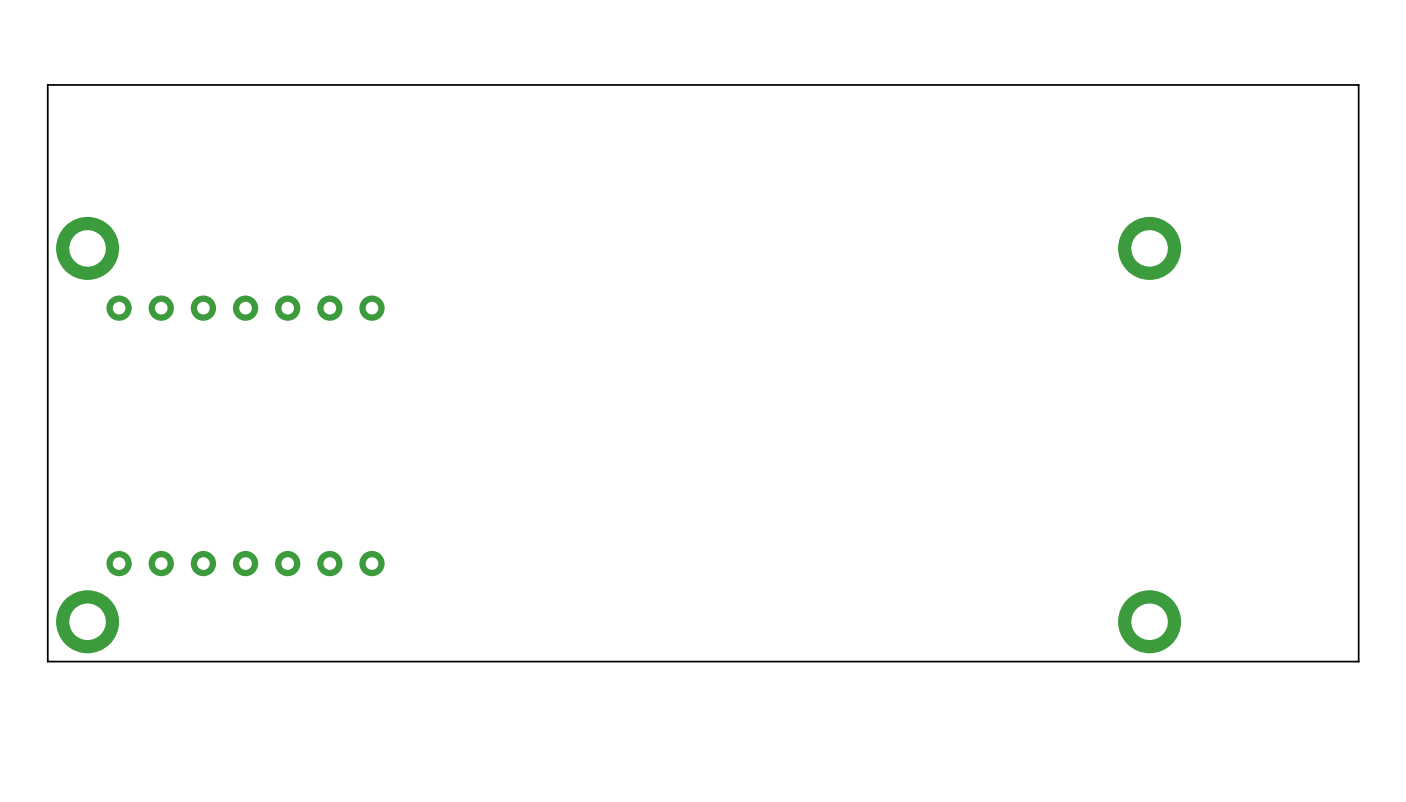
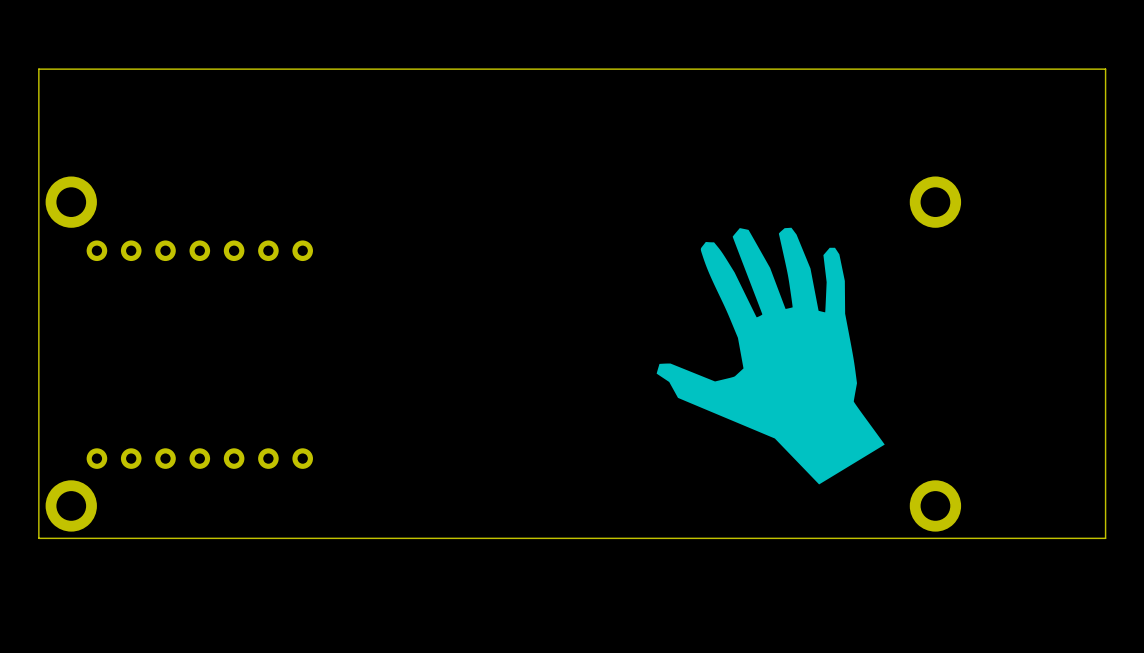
drawing: none -> [656, 227, 885, 485]

